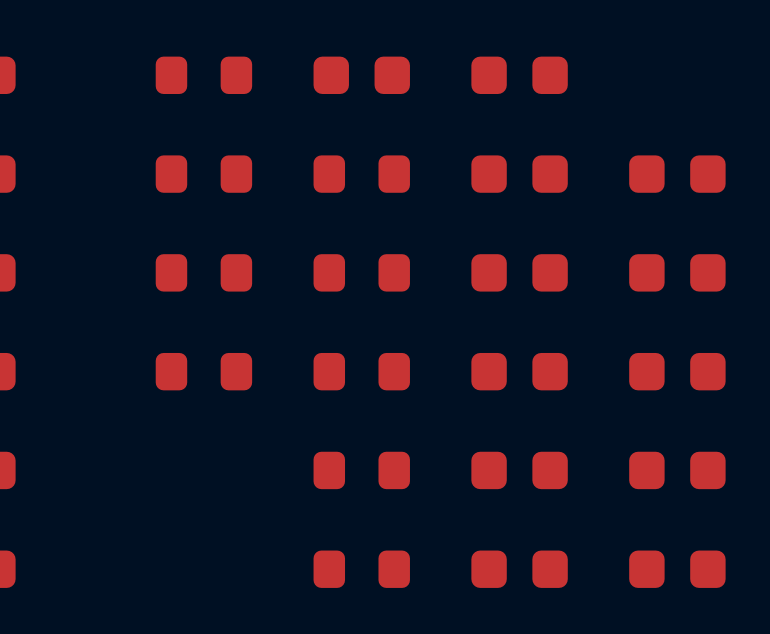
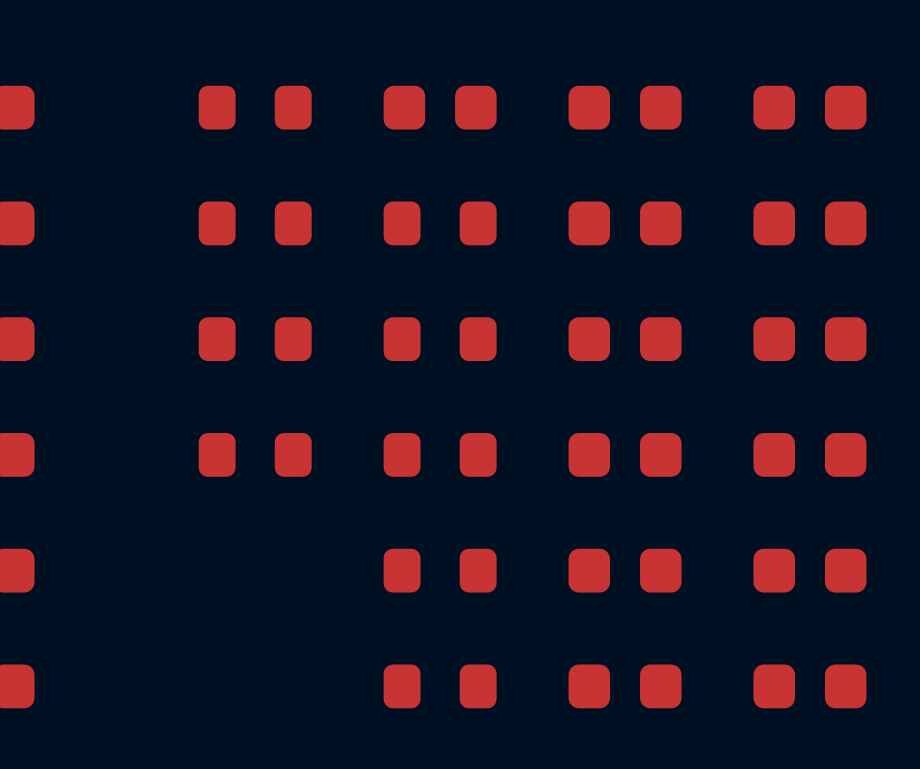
part: none -> (809, 107)

